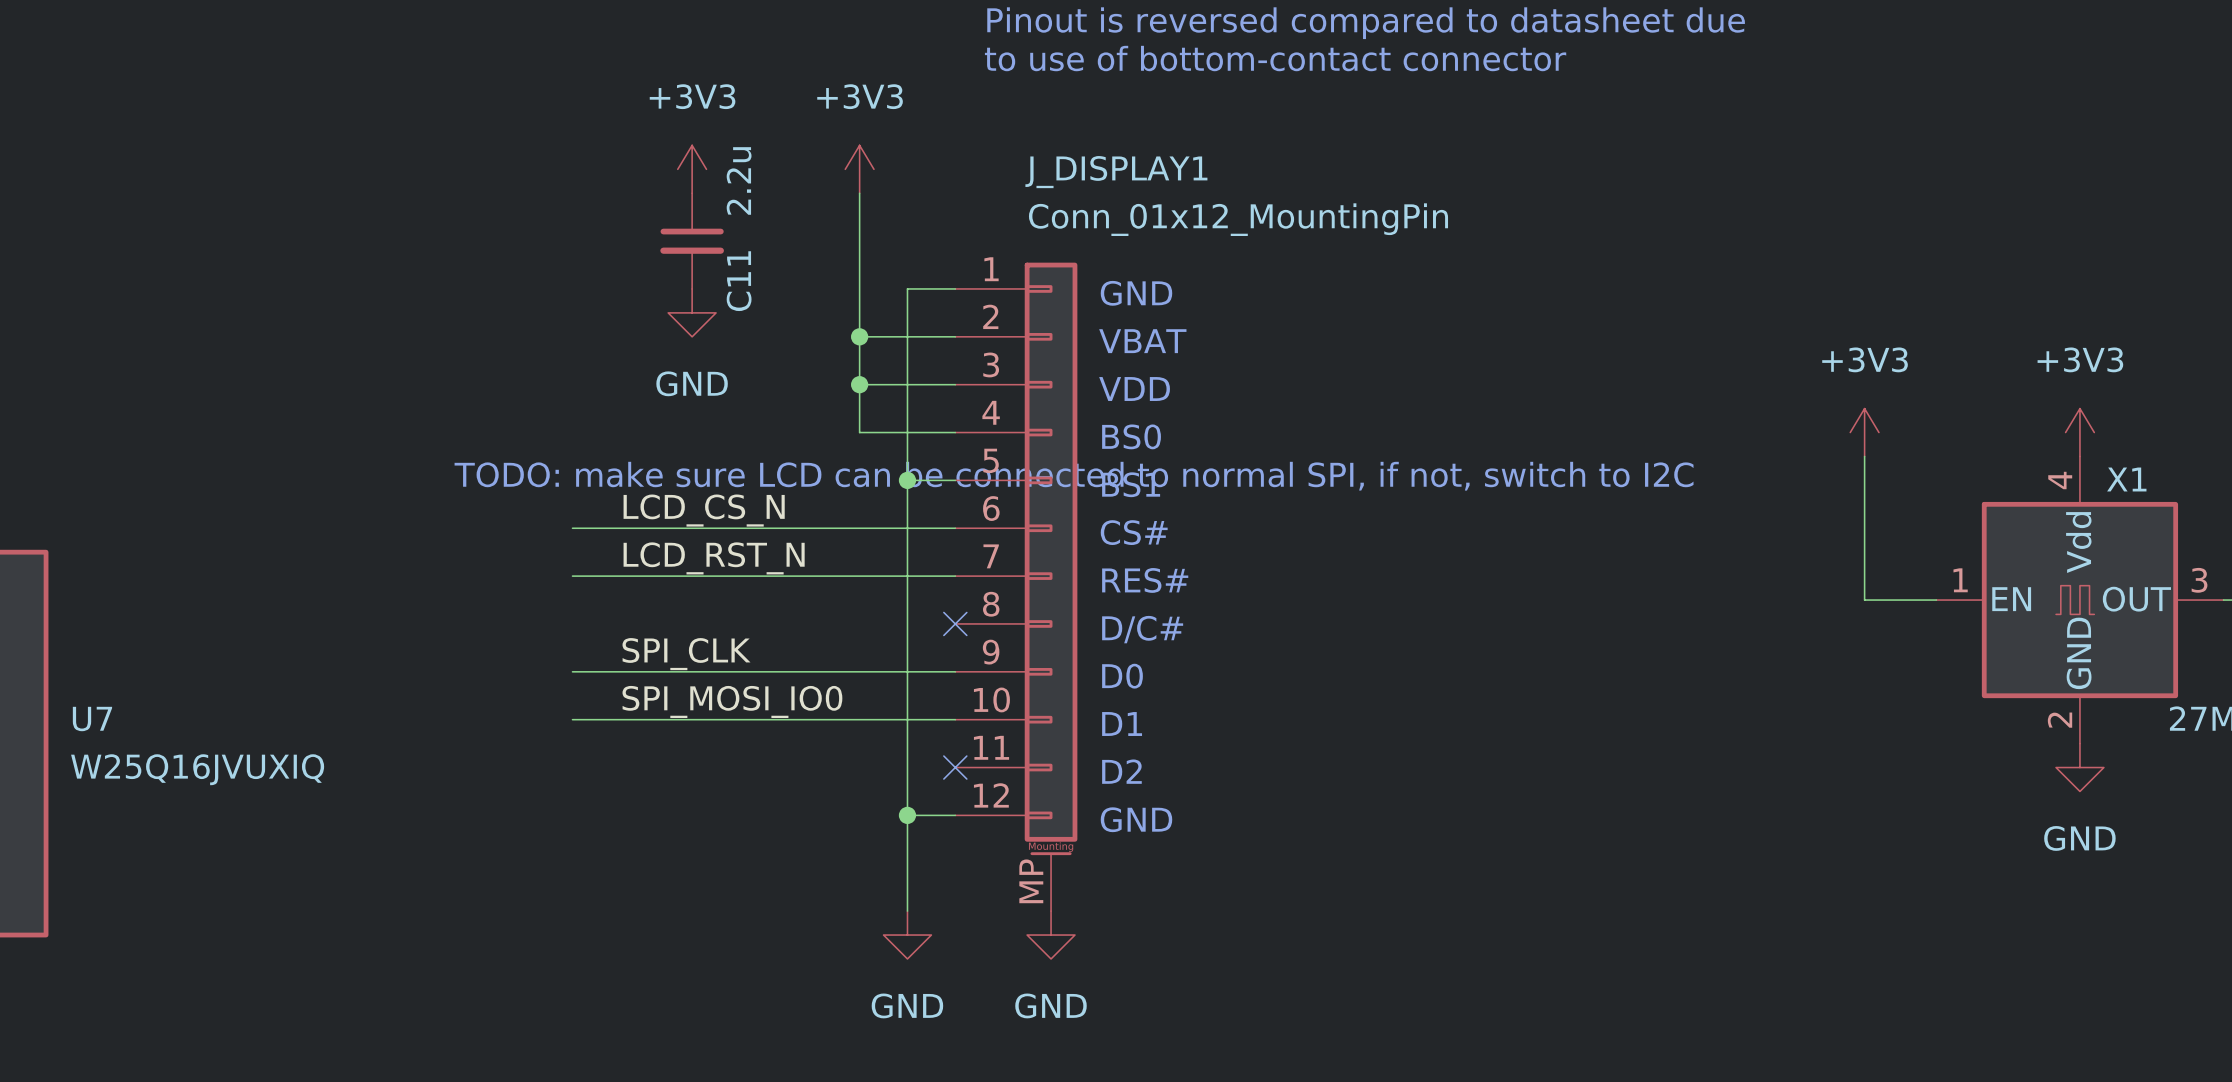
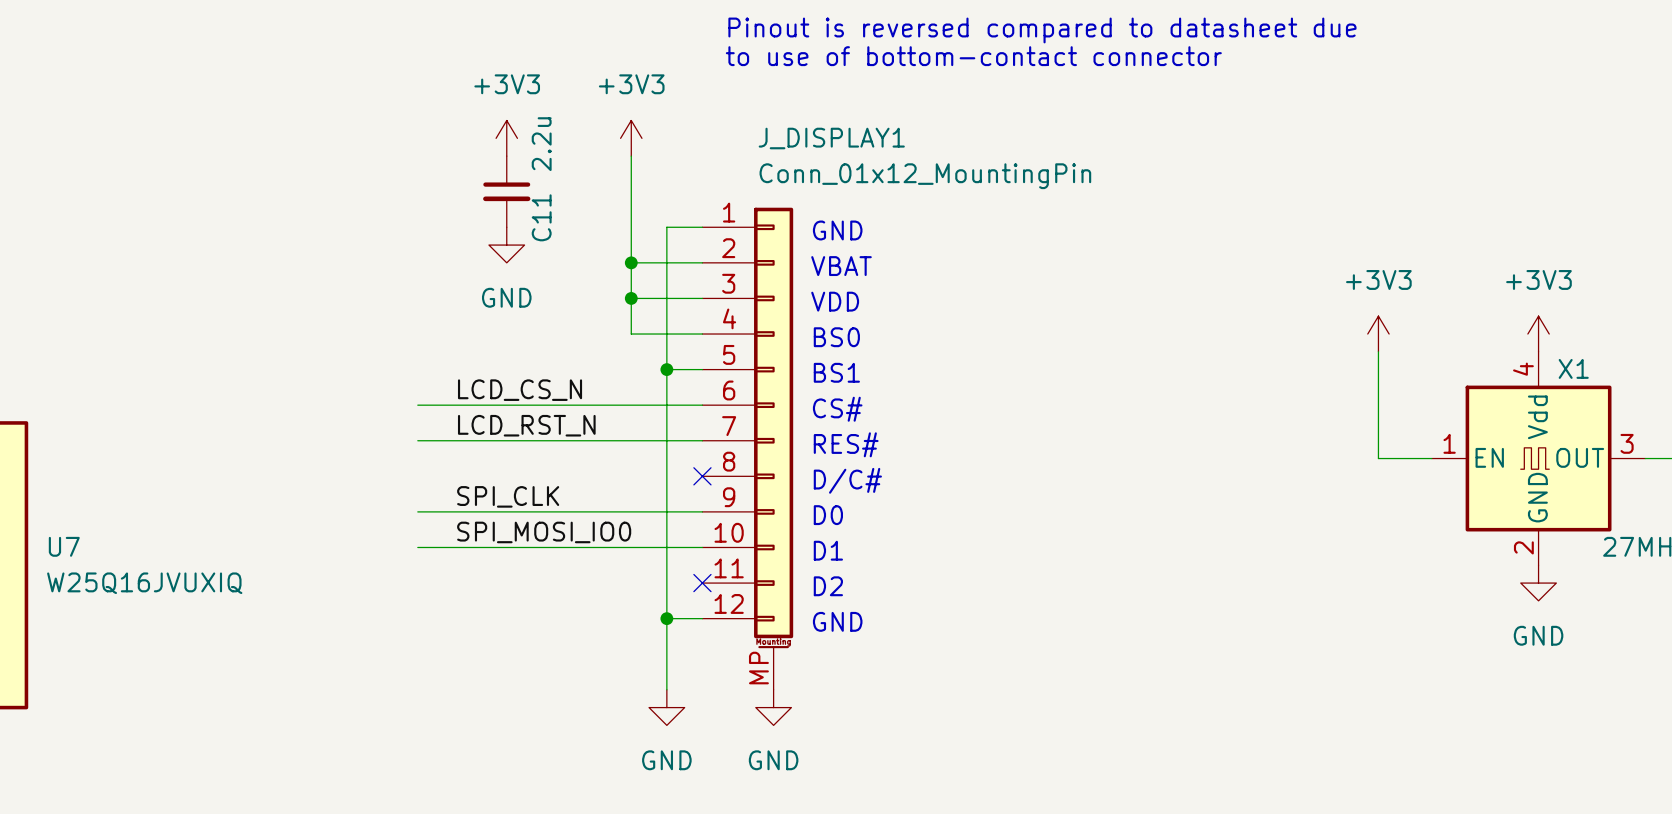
text: TODO: make sure LCD can be connected to normal SPI, if not, switch to I2C (1074, 476) -> none

